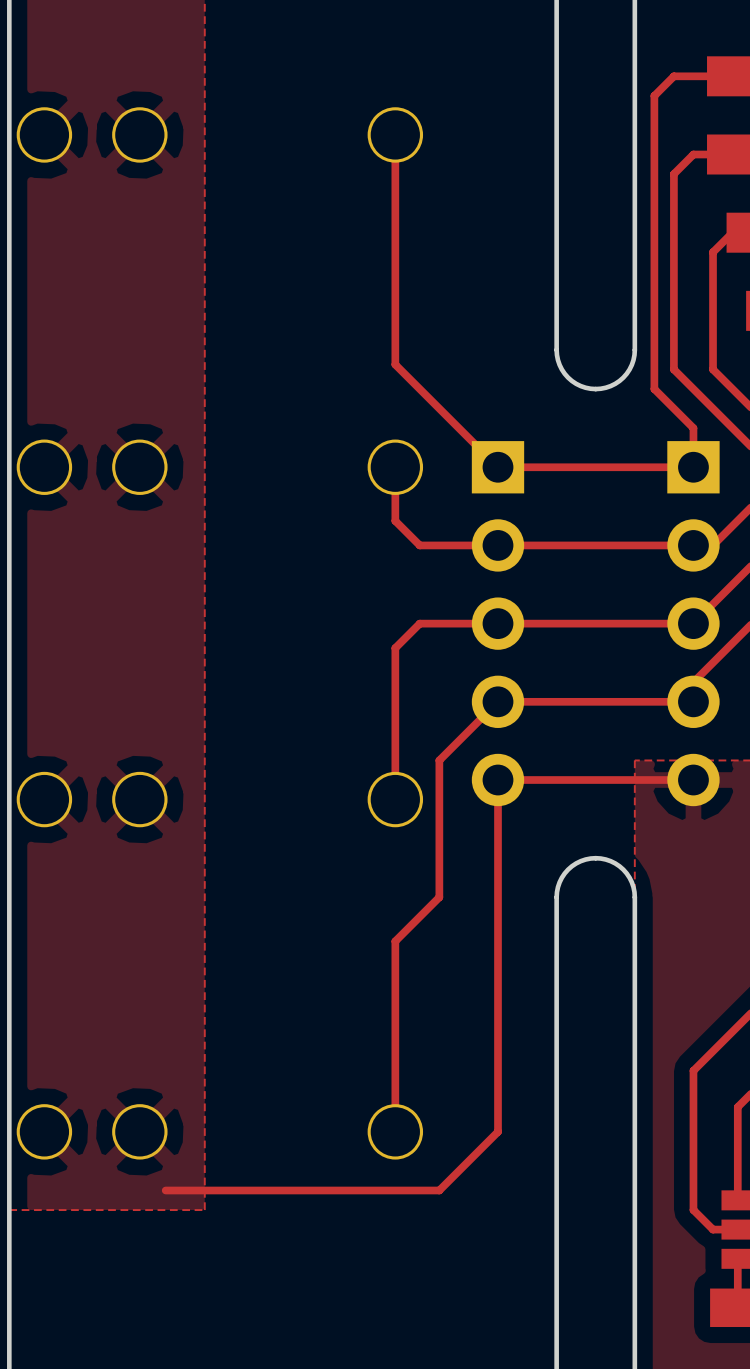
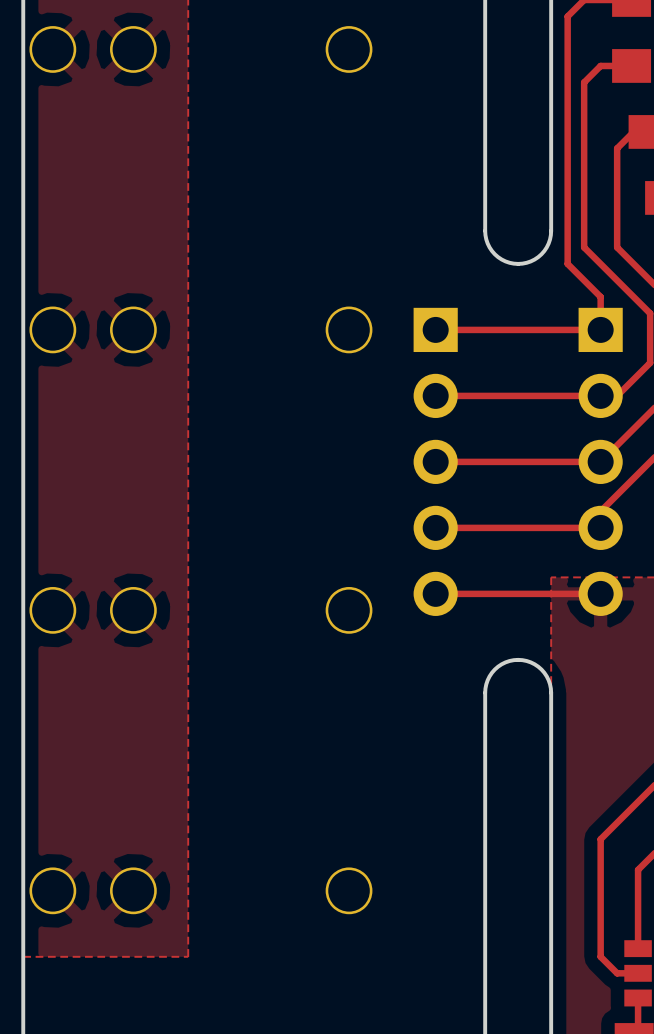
top track: (395, 134) (395, 364) (497, 467) -> none
top track: (395, 467) (395, 520) (419, 545) (497, 545) -> none
top track: (497, 623) (419, 623) (395, 648) (395, 799) -> none
top track: (497, 701) (439, 760) (439, 897) (395, 941) (395, 1131) -> none
top track: (497, 780) (497, 1131) (439, 1190) (165, 1190) -> none

